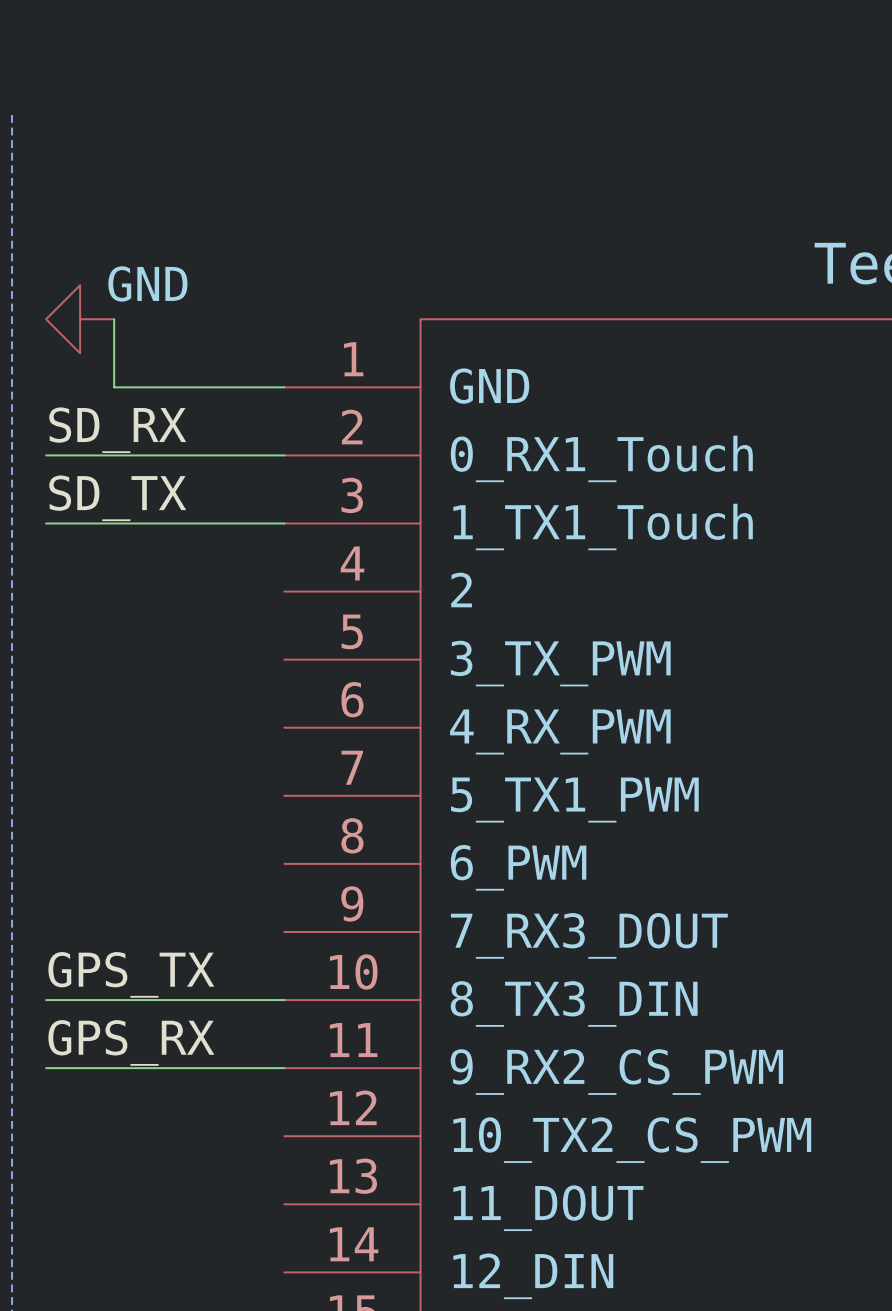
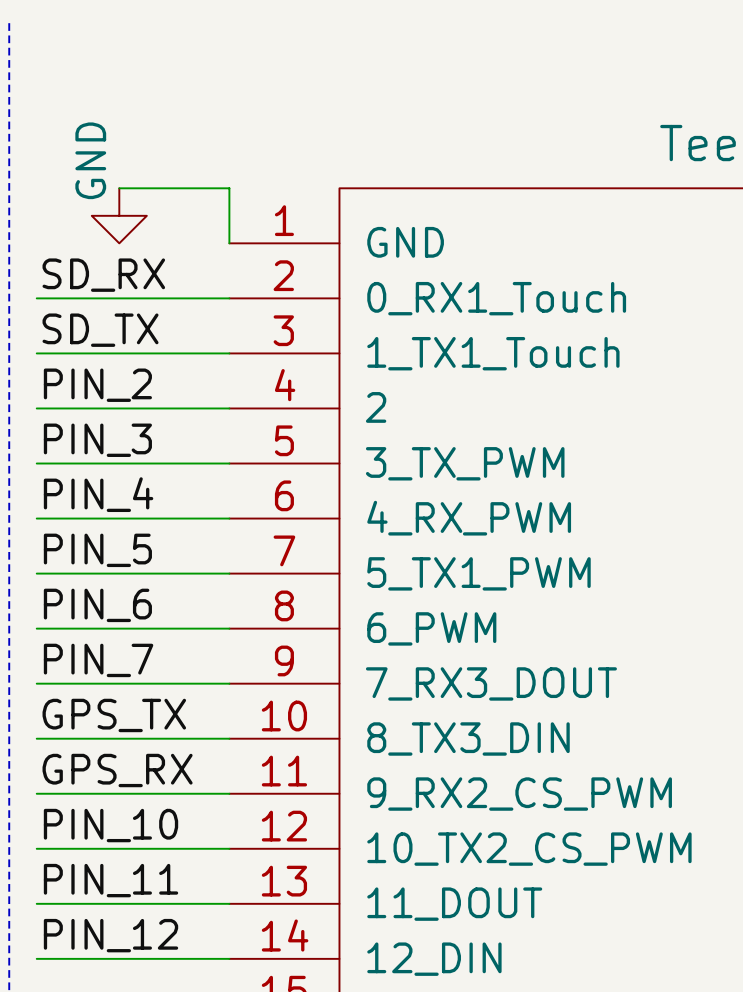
power symbol rotation: 0° (80, 319) -> 90° counterclockwise (119, 215)
power symbol position: GND (80, 319) -> GND (119, 215)
wire: (114, 319) (114, 387) (284, 387) -> (119, 188) (229, 188) (229, 243)
label: none -> PIN_2 (97, 385)
wire: none -> (36, 408) (229, 408)
label: none -> PIN_3 (97, 440)
wire: none -> (36, 463) (229, 463)
label: none -> PIN_4 (98, 494)
wire: none -> (36, 518) (229, 518)
label: none -> PIN_5 (97, 550)
wire: none -> (36, 573) (229, 573)
label: none -> PIN_6 (97, 605)
wire: none -> (36, 628) (229, 628)
label: none -> PIN_7 (98, 660)
wire: none -> (36, 683) (229, 683)
label: none -> PIN_10 (111, 825)
wire: none -> (36, 848) (229, 848)
label: none -> PIN_11 (111, 880)
wire: none -> (36, 903) (229, 903)
label: none -> PIN_12 (111, 935)
wire: none -> (36, 958) (229, 958)

